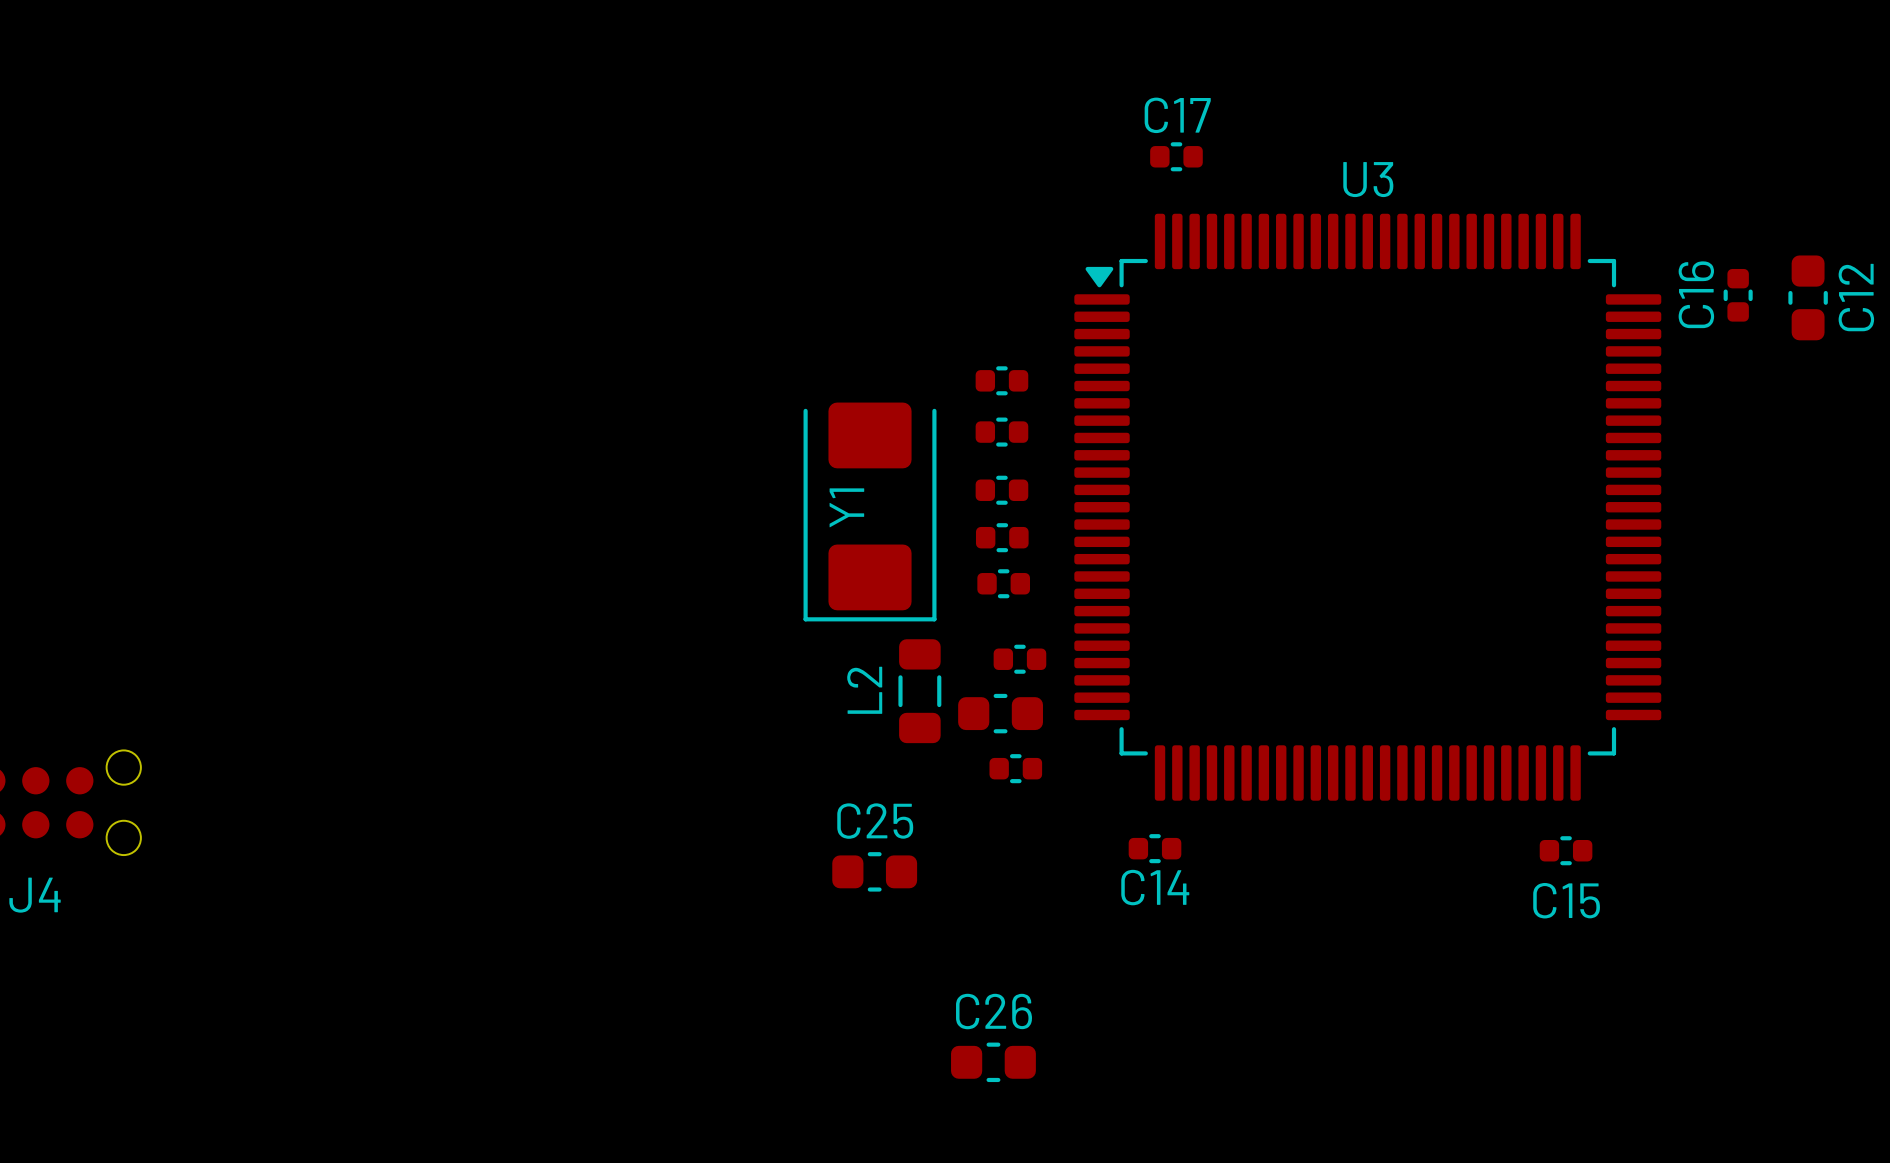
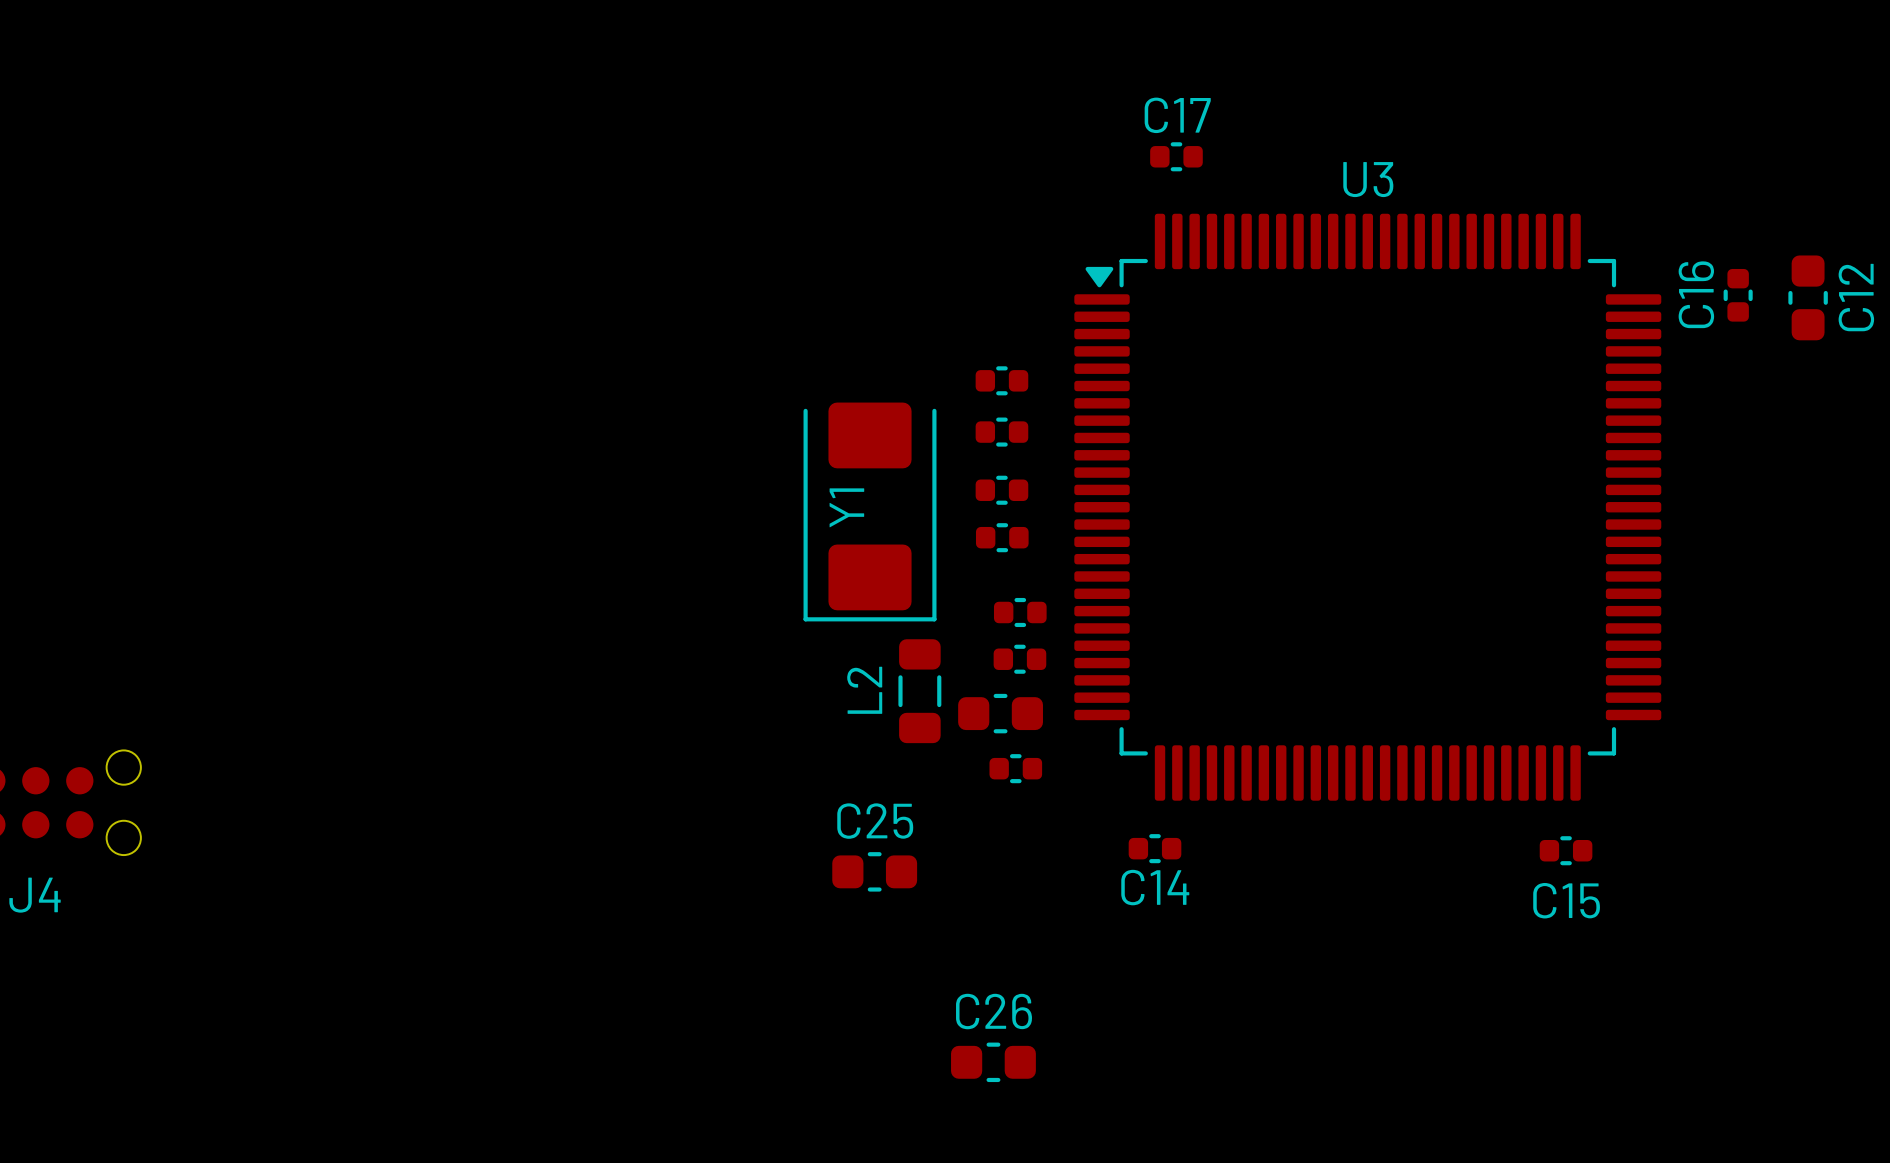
part position: (1003, 583) -> (1020, 612)

